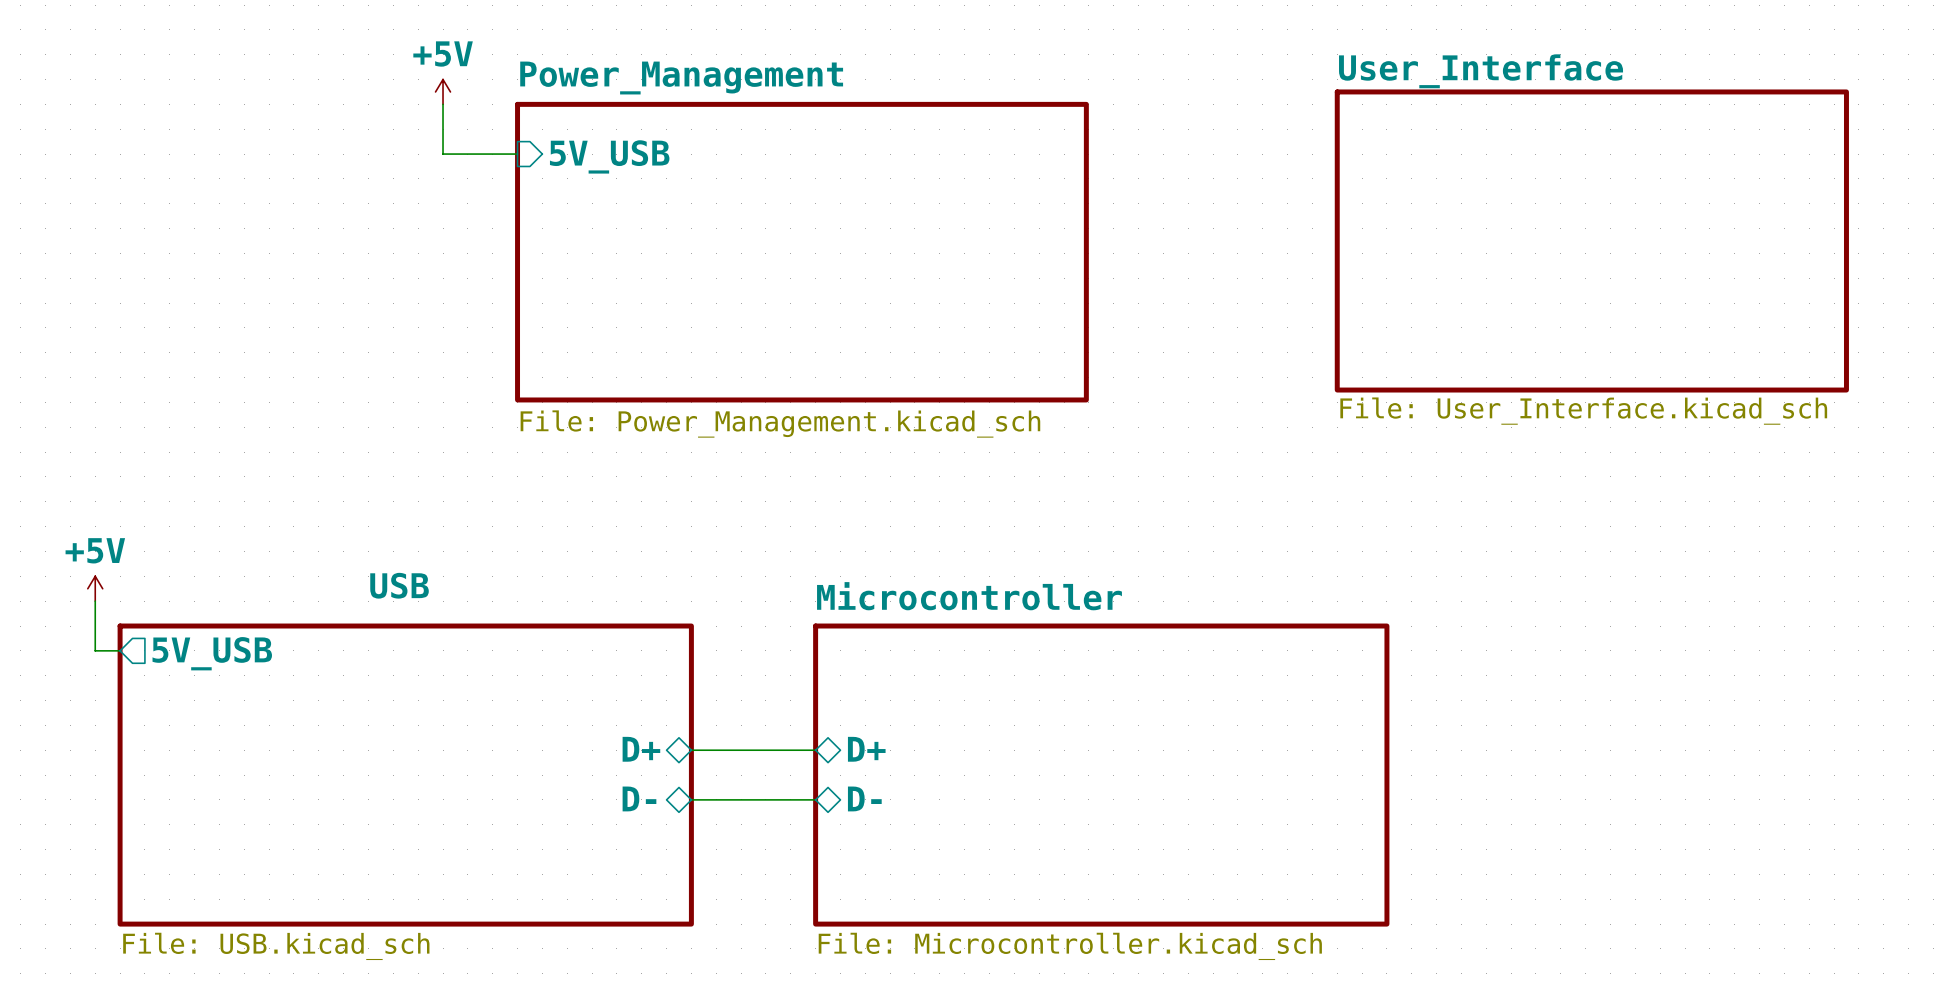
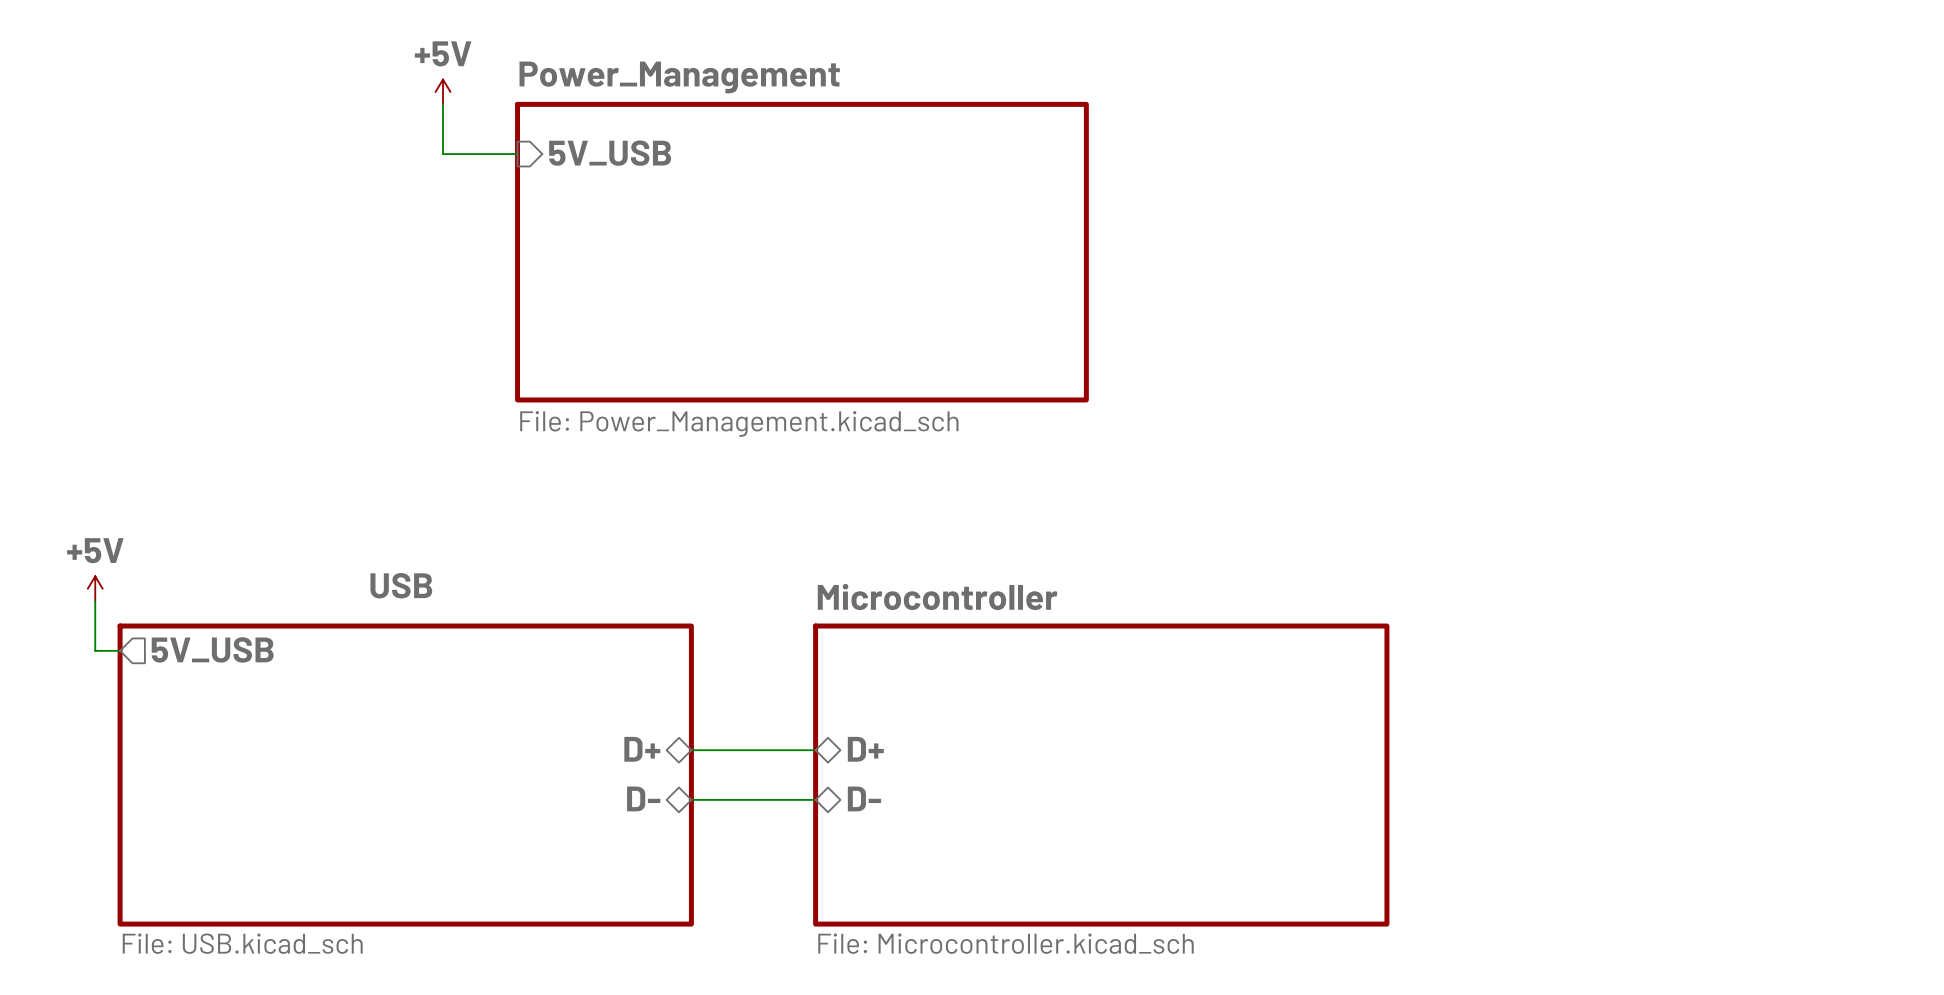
sheet User_Interface: File: User_Interface.kicad_sch (1591, 240) -> none

